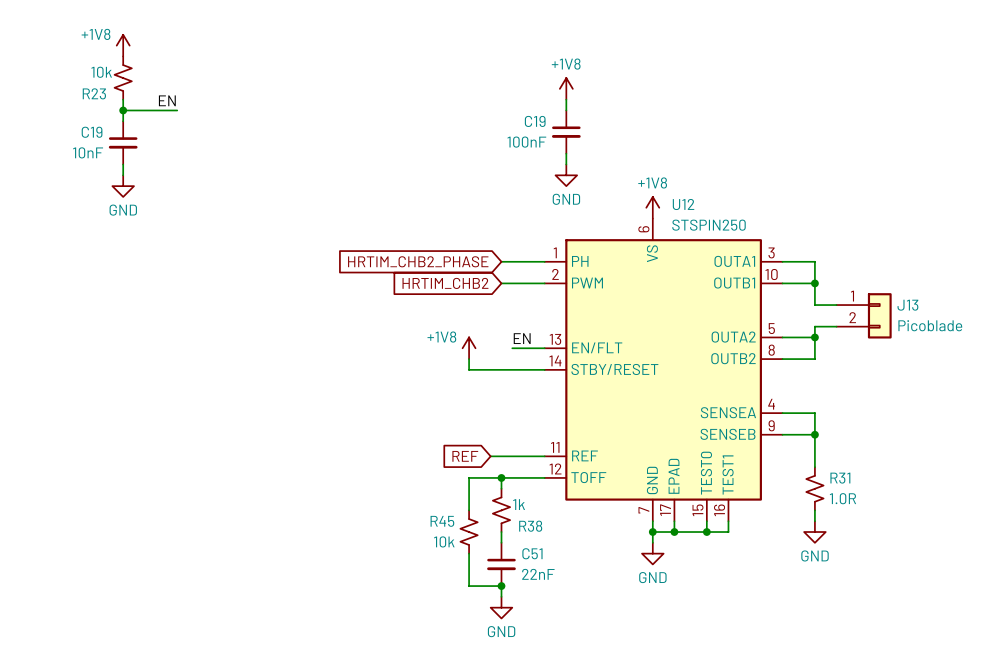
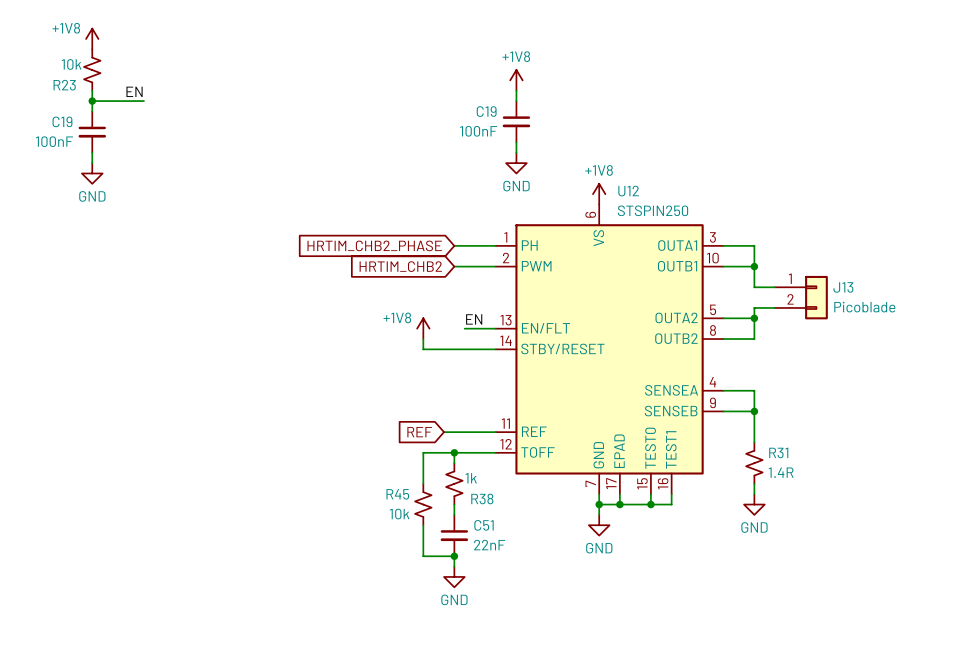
C19 value: 10nF (88, 152) -> 100nF (54, 141)
R31 value: 1.0R (842, 498) -> 1.4R (781, 472)

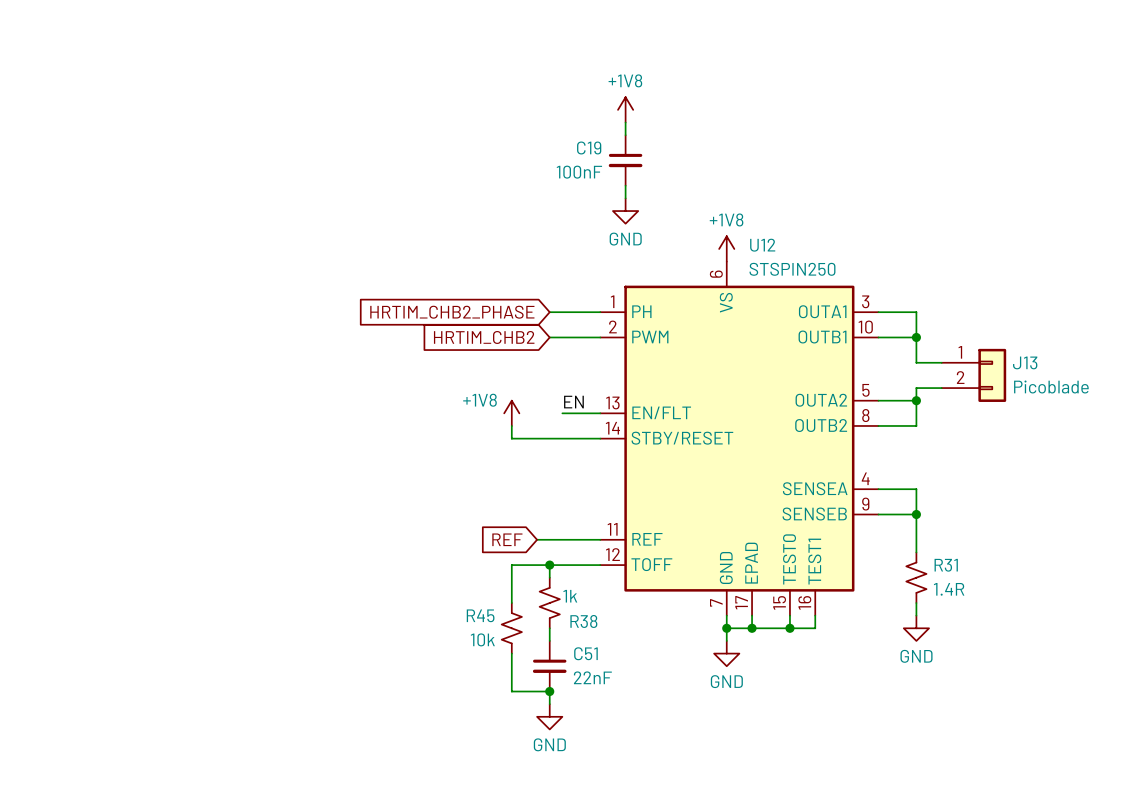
power symbol: +1V8 (92, 38) -> none
R23: 10k (92, 70) -> none
wire: (92, 90) (92, 111) -> none
label: EN (134, 91) -> none
wire: (92, 101) (144, 101) -> none
junction: (92, 101) -> none
C19: 100nF (92, 132) -> none
wire: (92, 152) (92, 163) -> none
power symbol: GND (92, 173) -> none

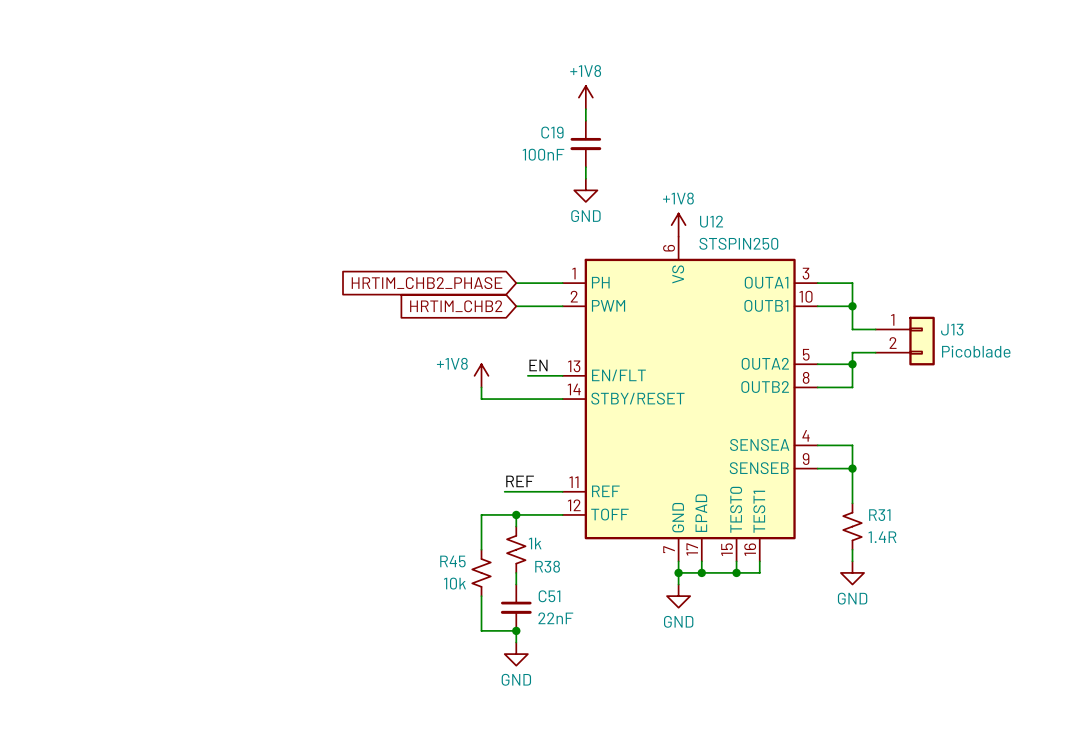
label: none -> REF (520, 481)
global label: REF (507, 539) -> none

